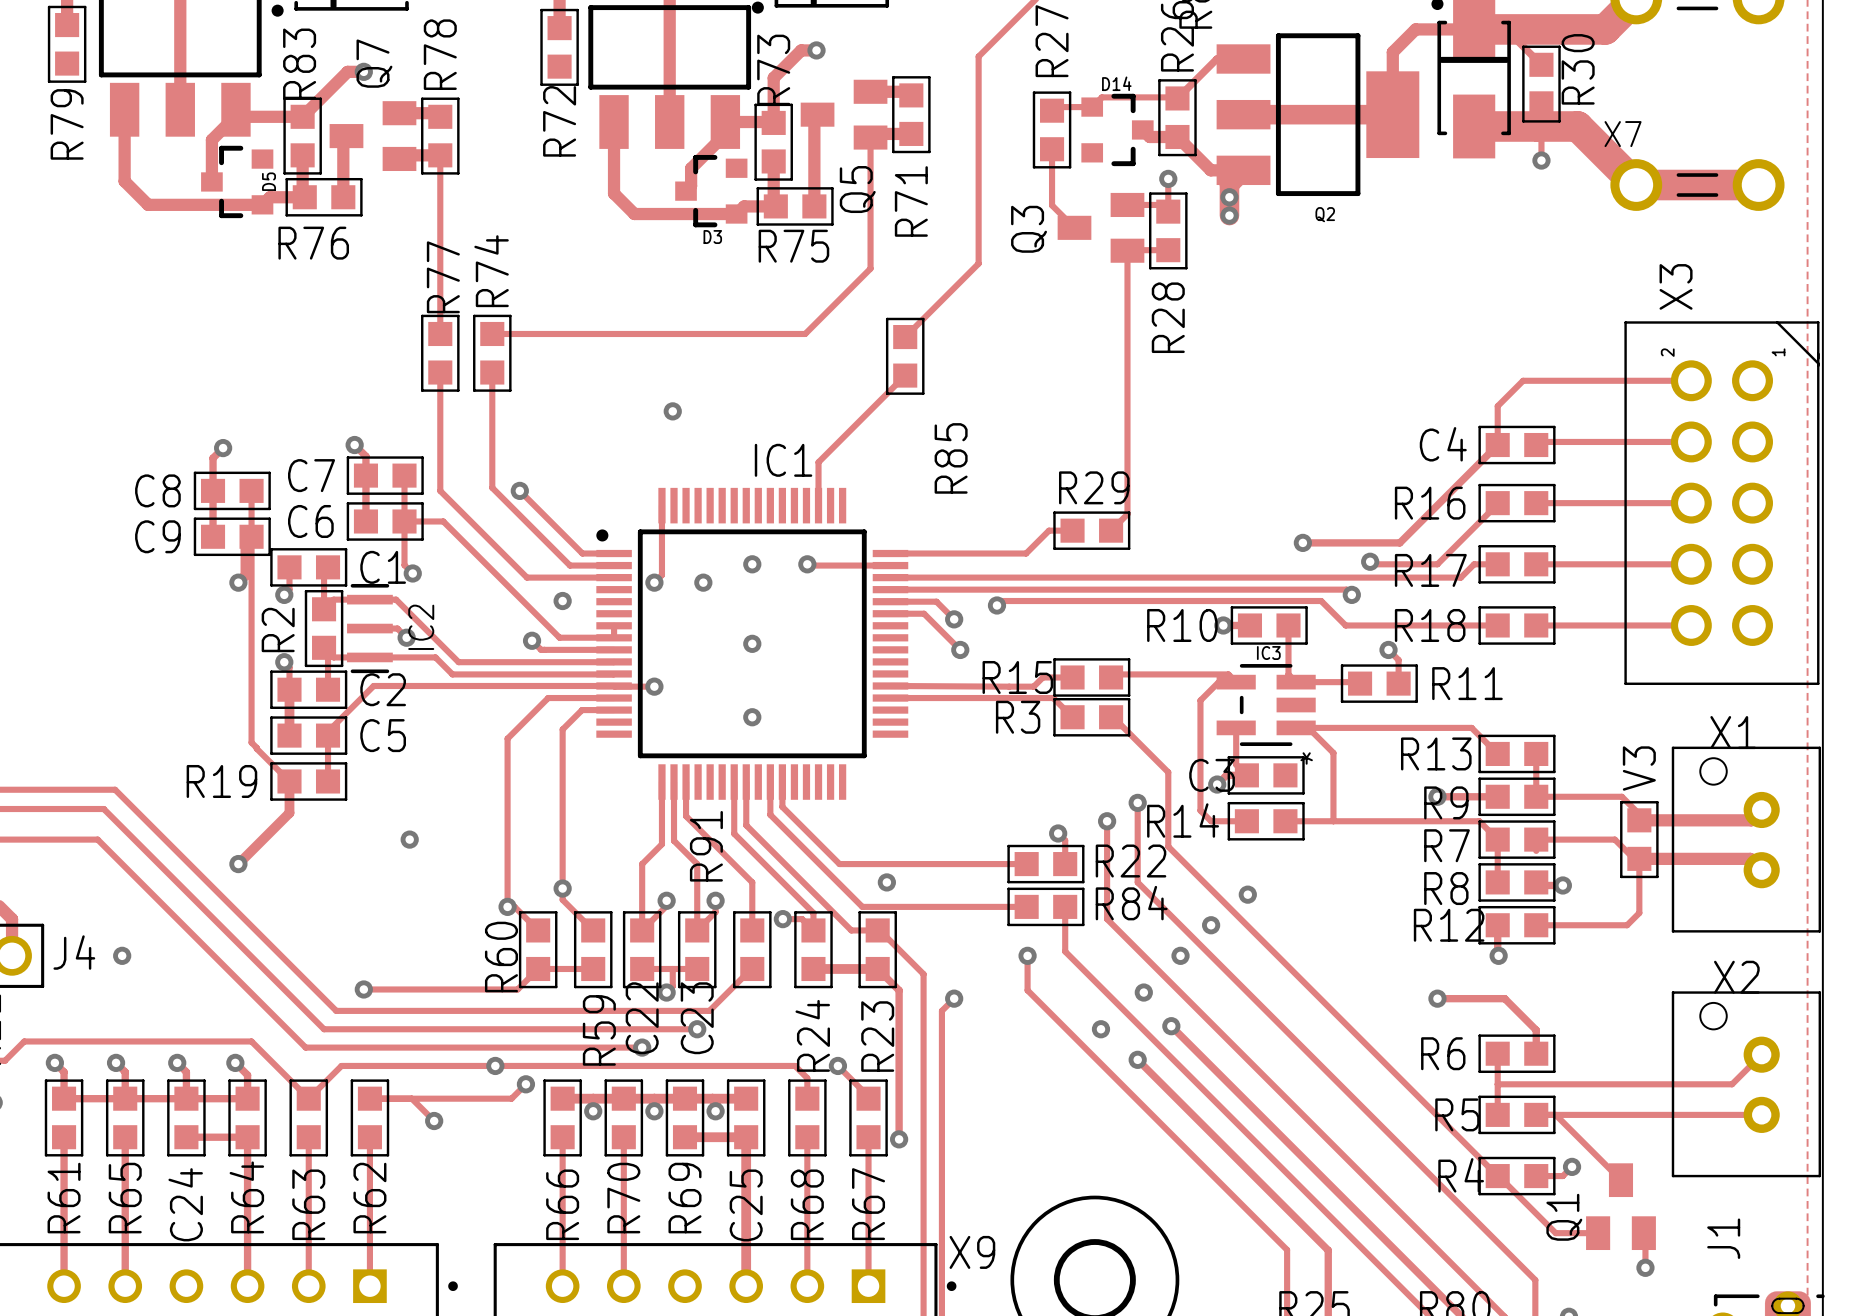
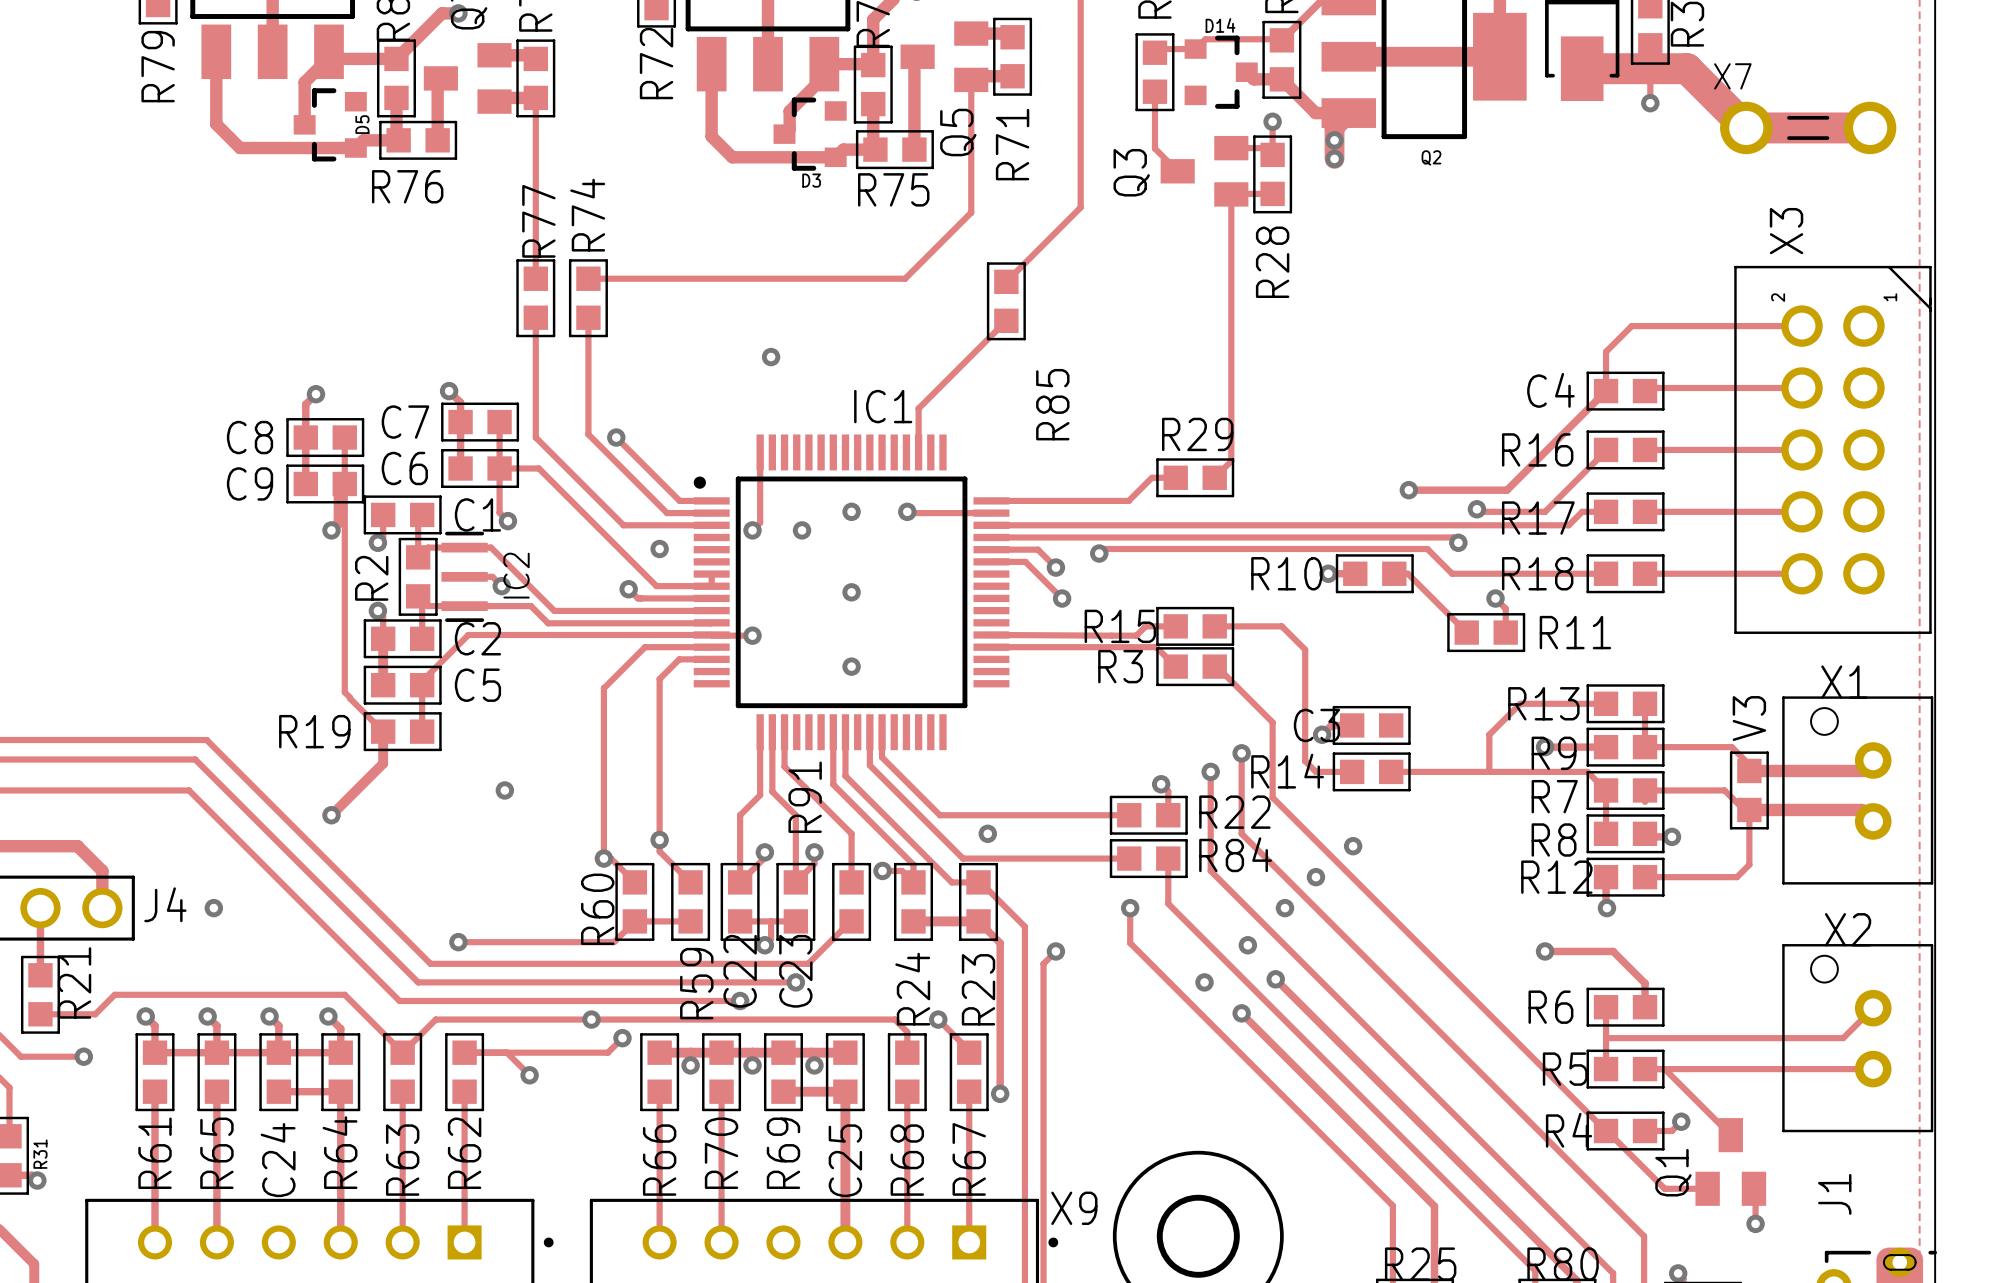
track: (1288, 625) (1288, 674) (1296, 682) (1358, 682) -> (1394, 573) (1407, 573) (1465, 631)
track: (1114, 674) (1228, 674) (1236, 682) (1218, 682) (1200, 700) -> (1214, 626) (1281, 626) (1305, 649)
IC3: (1266, 705) -> none
track: (1236, 727) (1236, 764) (1246, 775) -> none
track: (1296, 727) (1471, 727) (1497, 753) -> (1489, 771) (1489, 734) (1520, 703) (1606, 703)
track: (1308, 727) (1333, 752) (1333, 821) -> none

